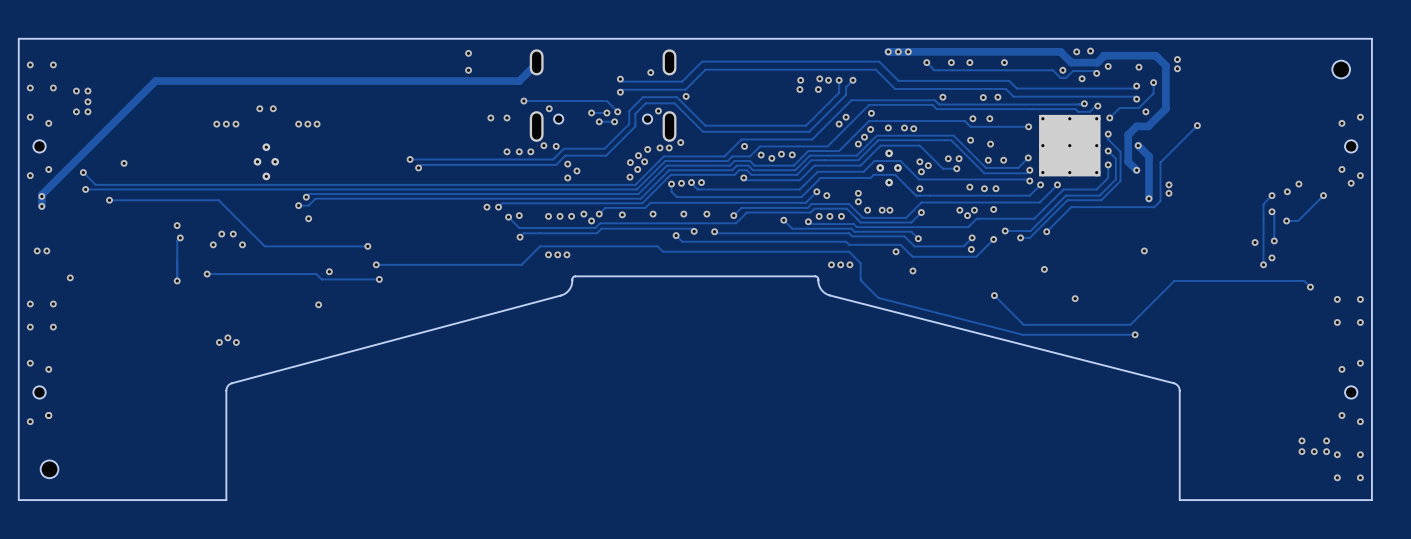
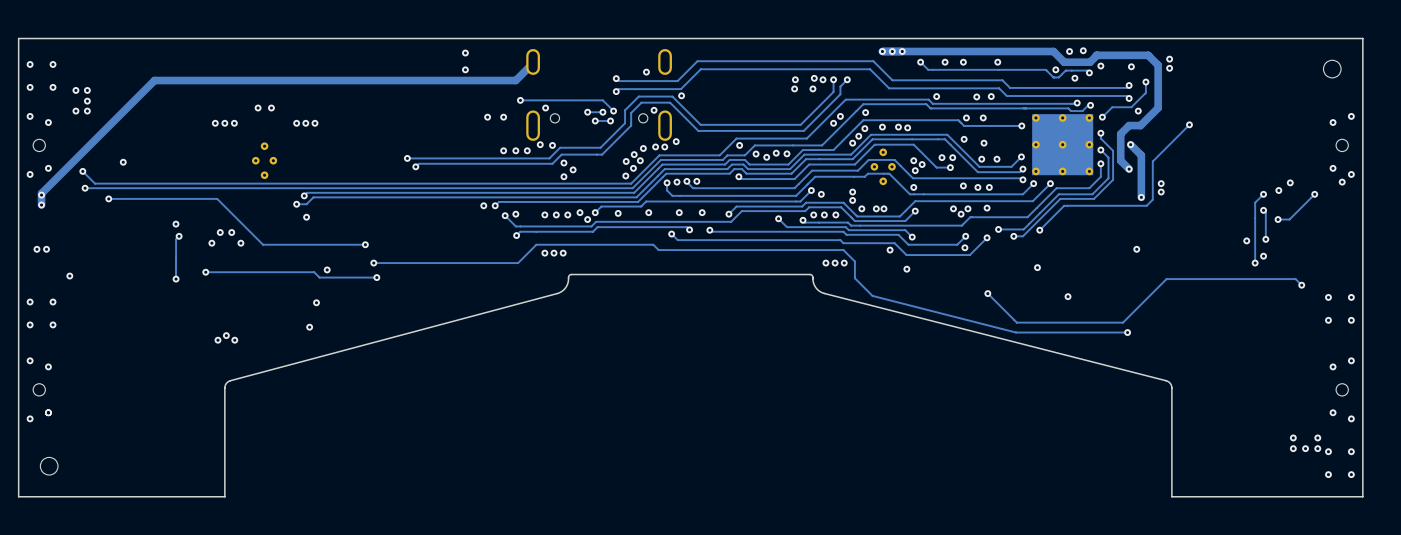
via: none -> (309, 327)

